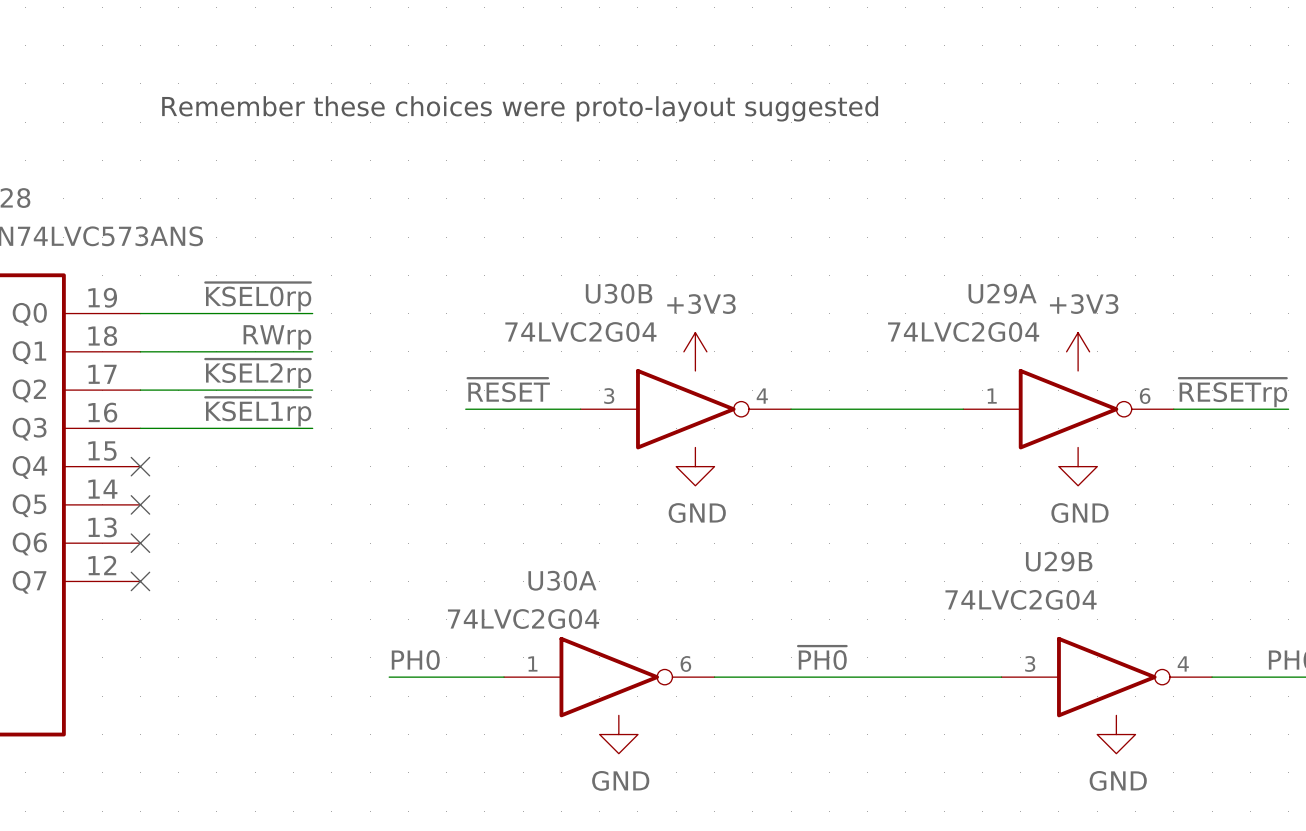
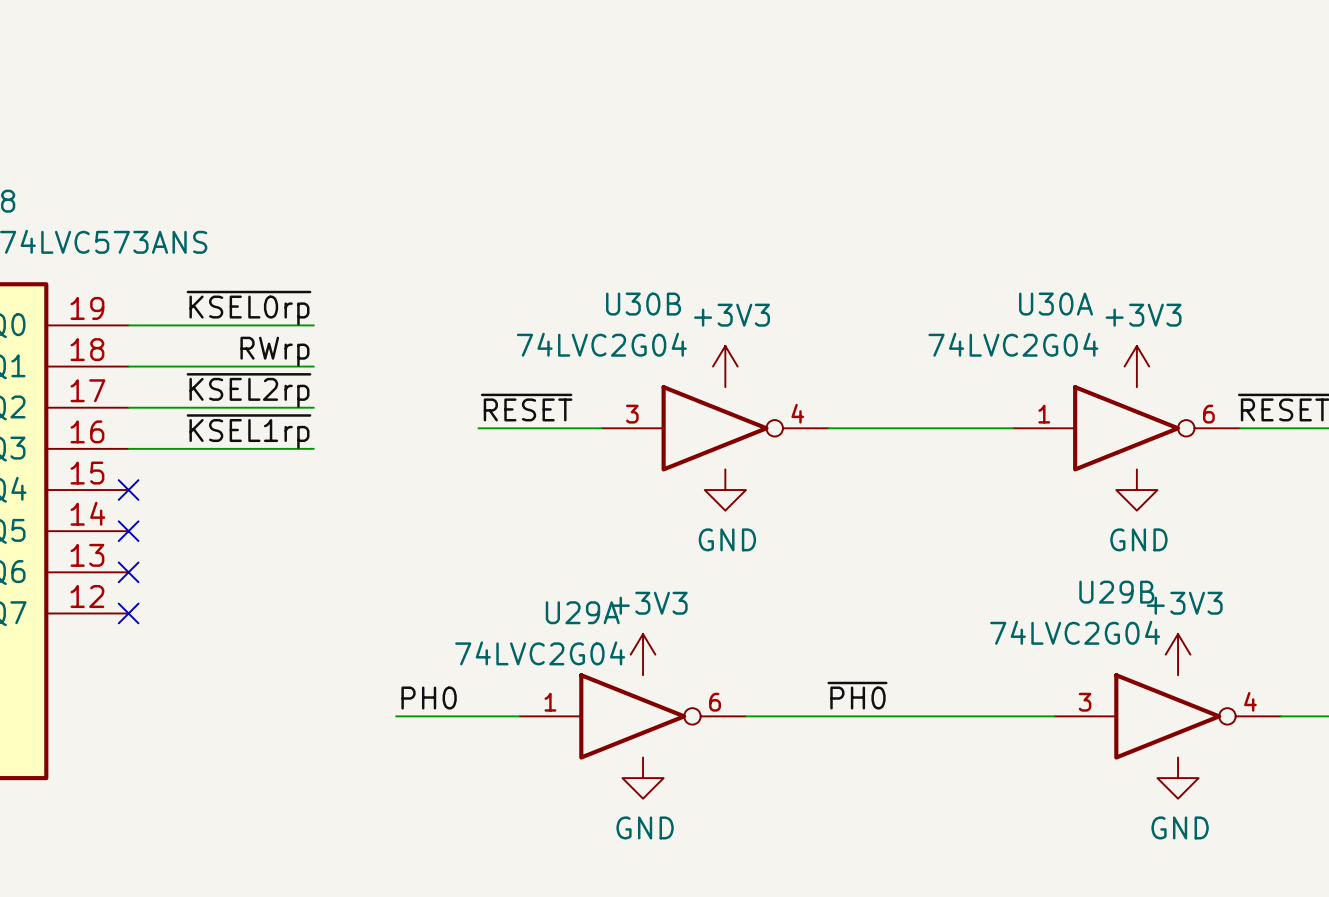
text: Remember these choices were proto-layout suggested (520, 108) -> none
U29A name: U29A (1002, 293) -> U30A (1056, 304)
U30A name: U30A (562, 580) -> U29A (582, 612)
power symbol: none -> +3V3 (643, 654)
power symbol: none -> +3V3 (1178, 654)

